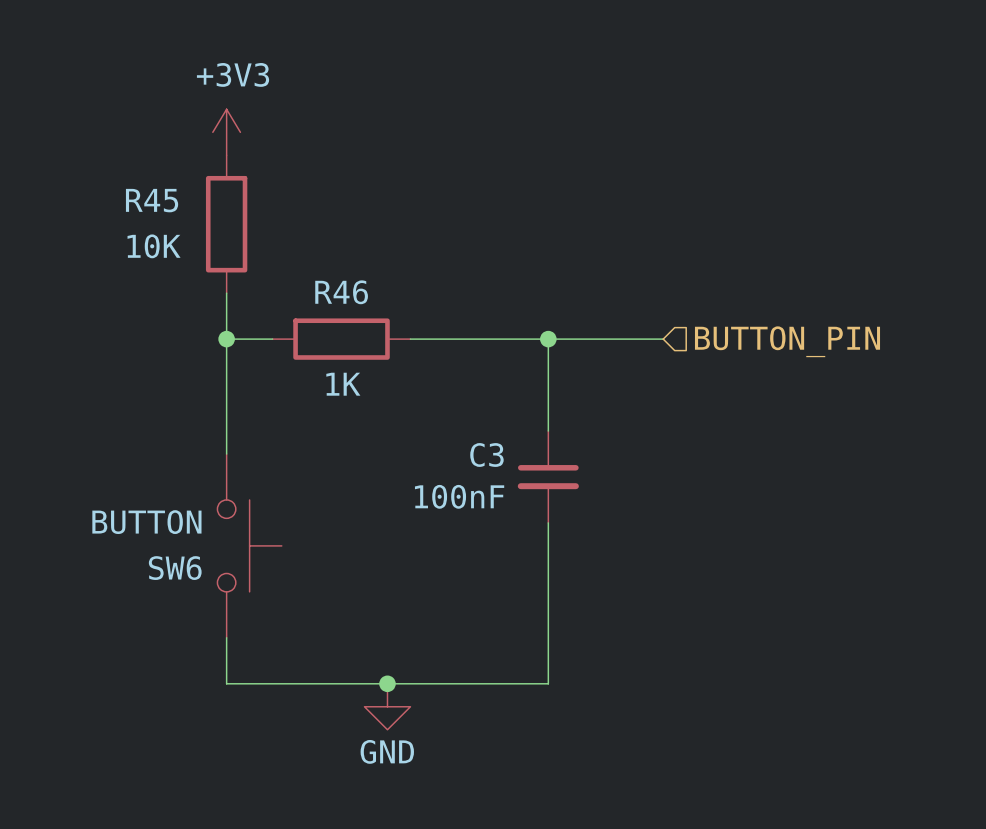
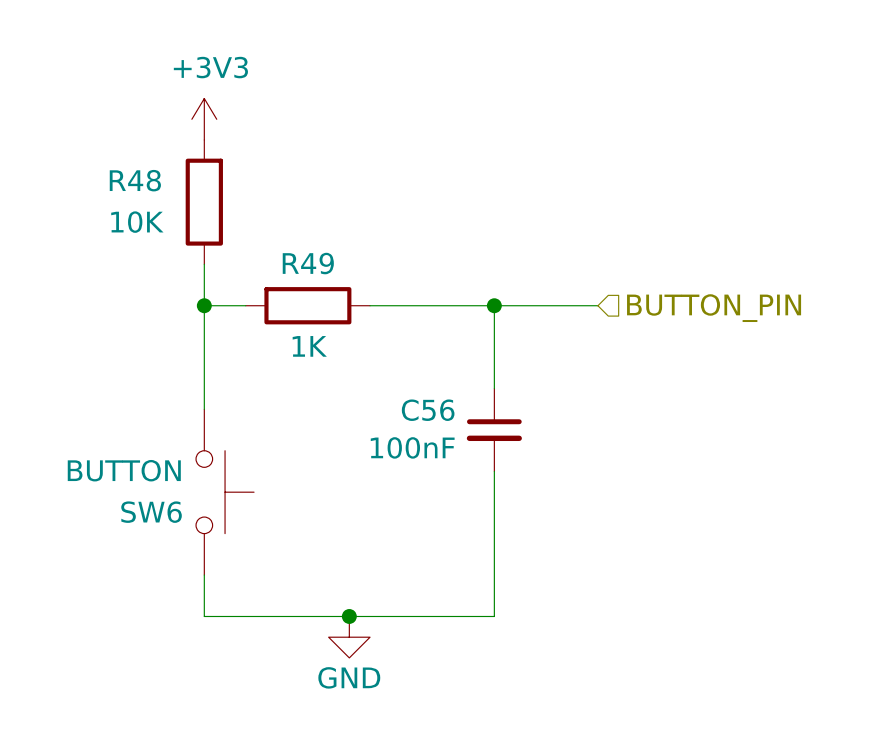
R45 name: R45 (152, 200) -> R48 (135, 180)
R46 name: R46 (341, 292) -> R49 (308, 263)
C3 name: C3 (486, 455) -> C56 (428, 410)

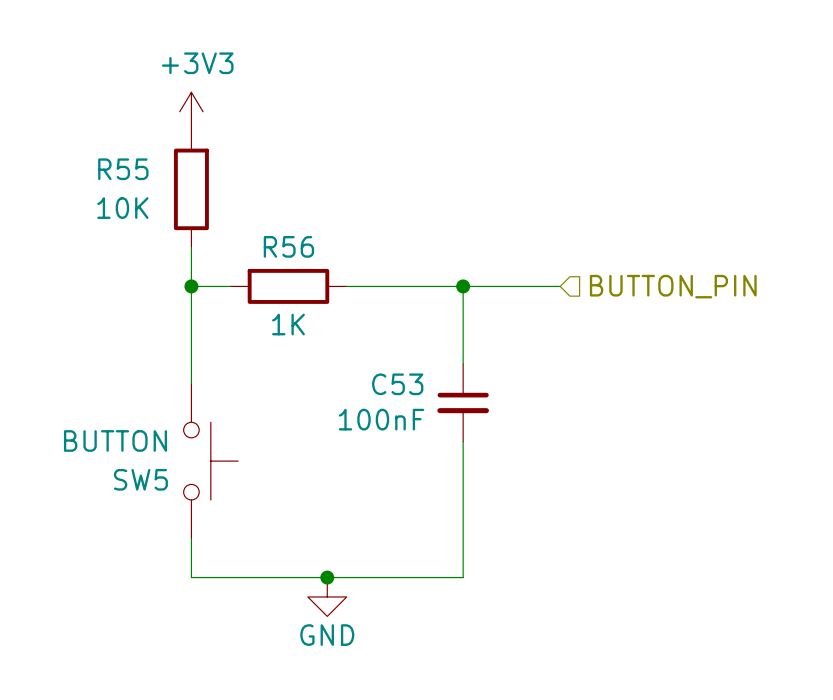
R48 name: R48 (135, 180) -> R55 (123, 169)
R49 name: R49 (308, 263) -> R56 (288, 246)
C56 name: C56 (428, 410) -> C53 (397, 384)
SW6 name: SW6 (151, 512) -> SW5 (140, 479)

